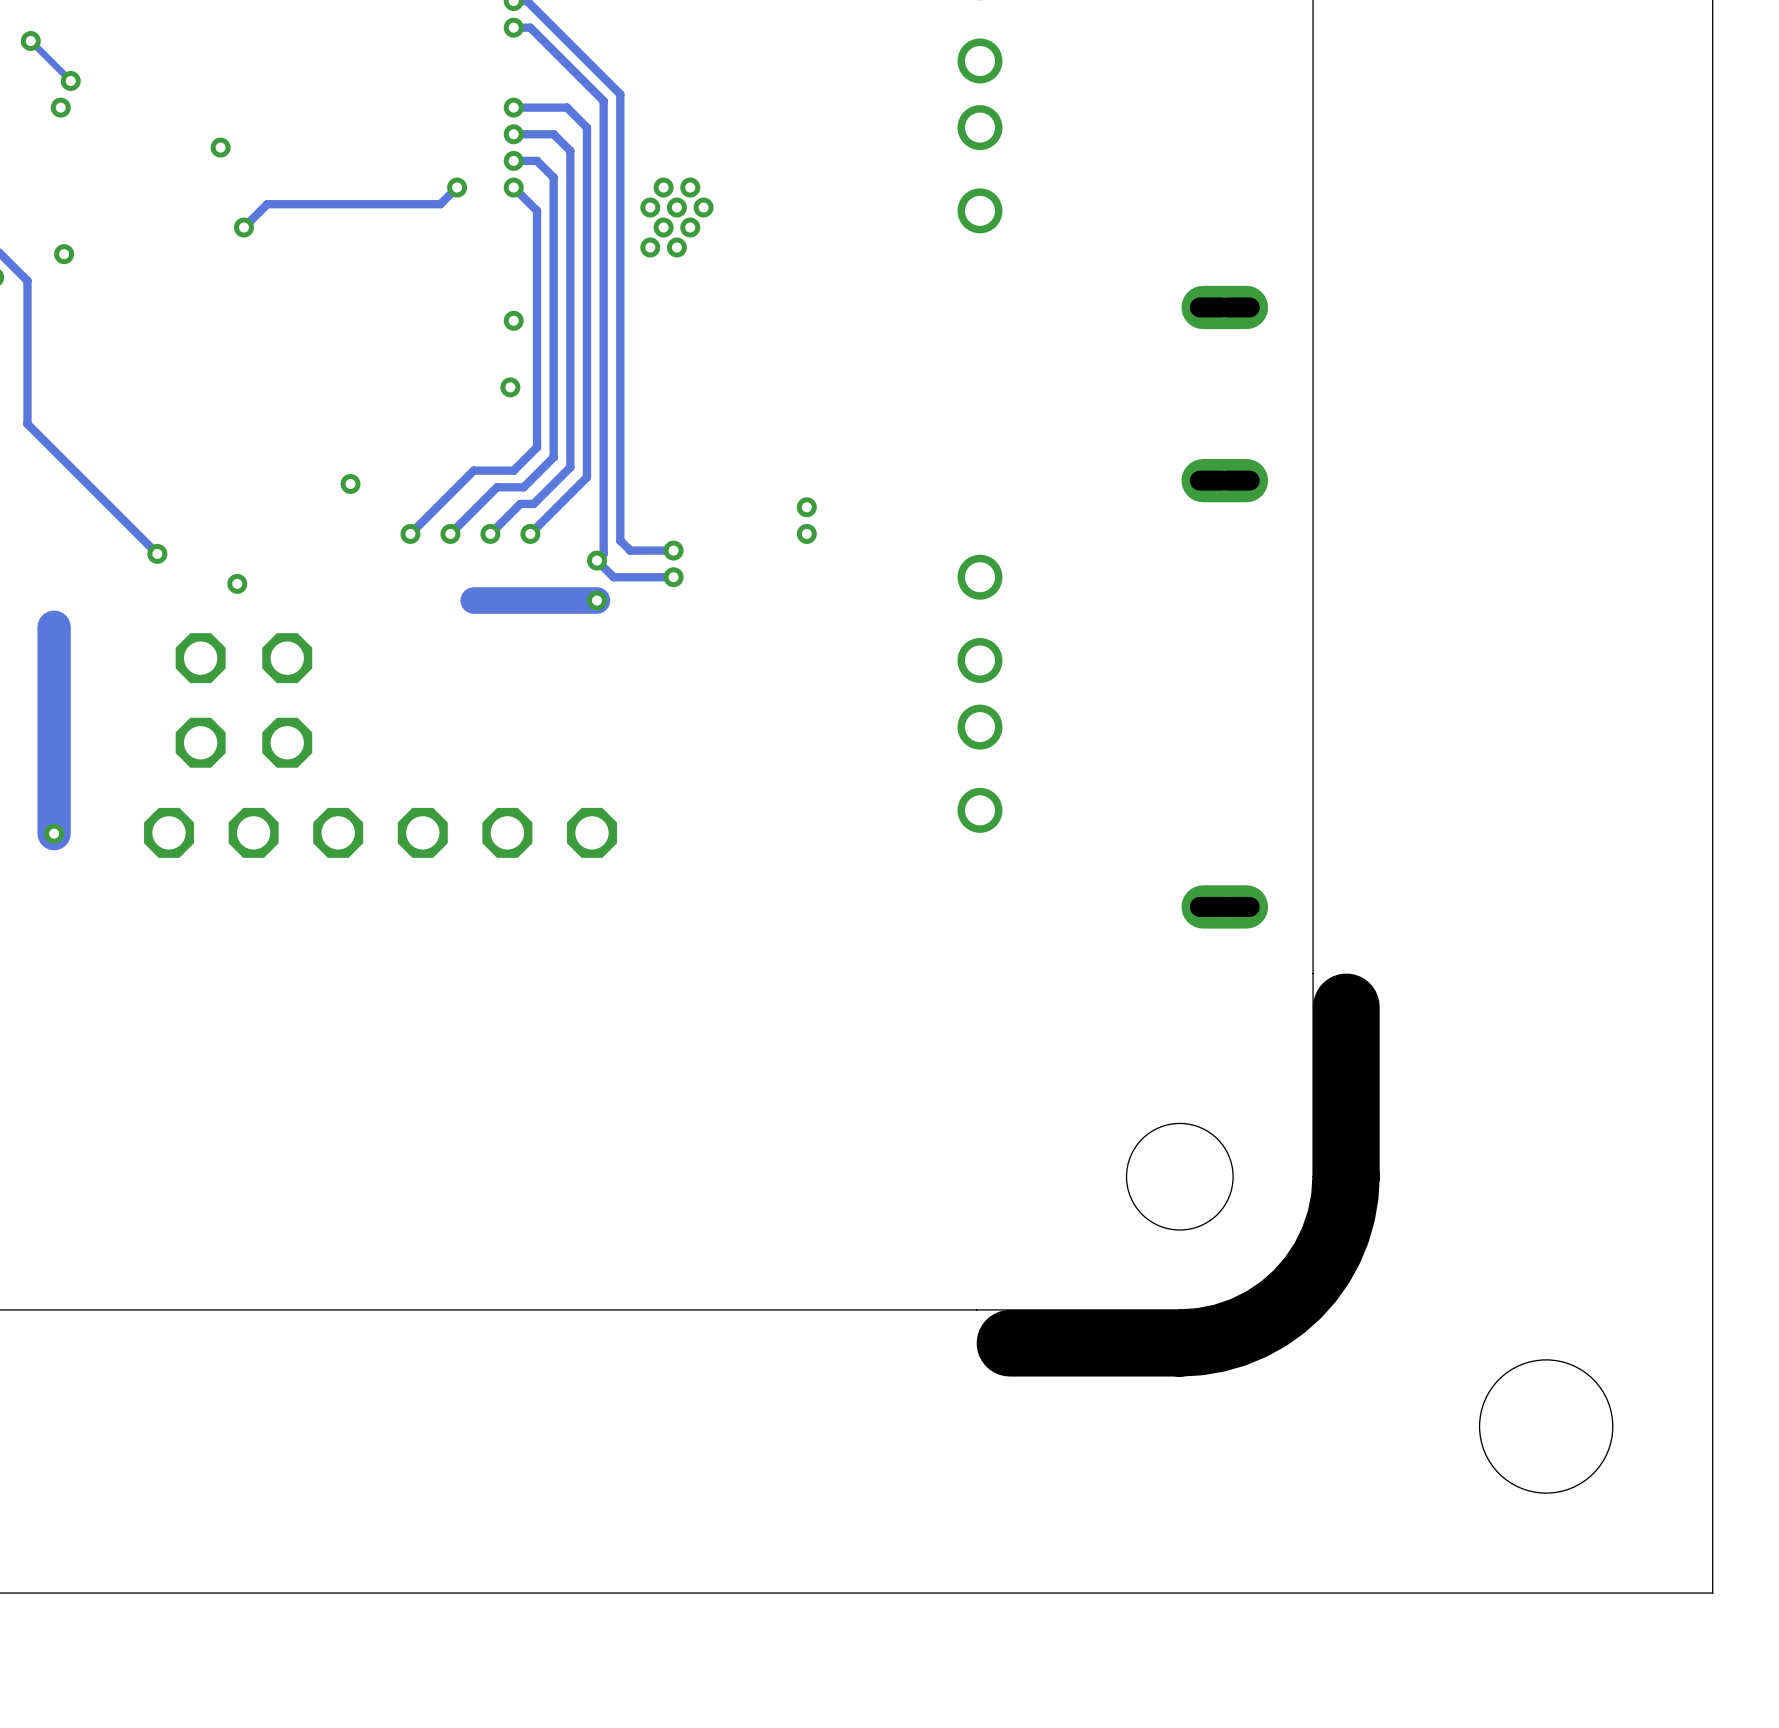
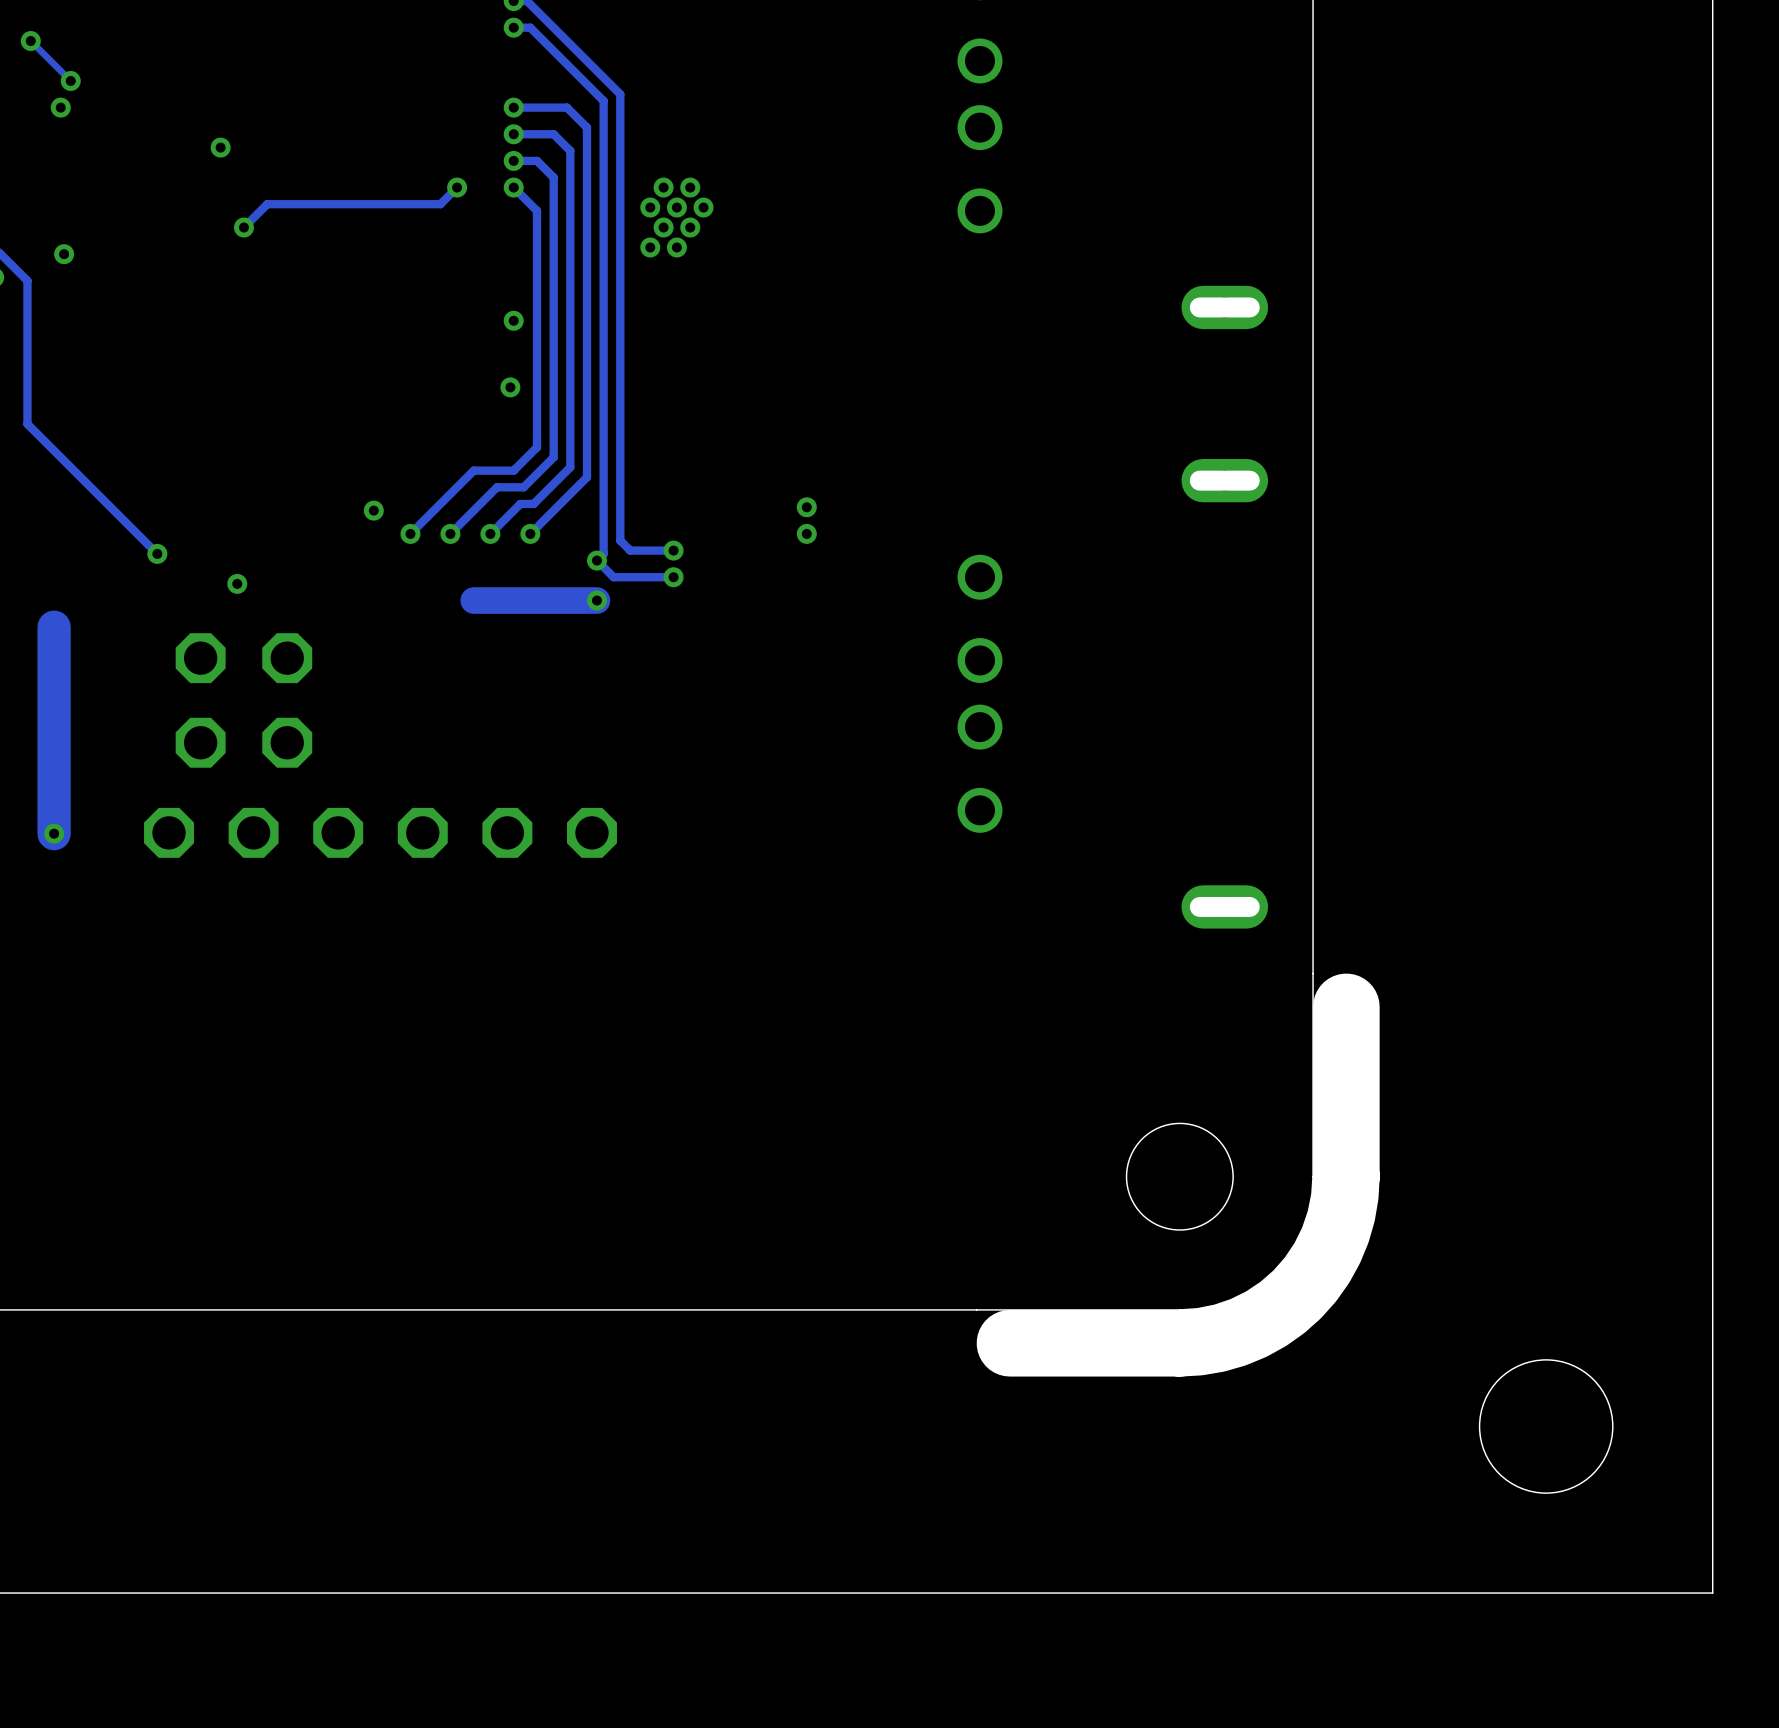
via position: (350, 483) -> (373, 510)

